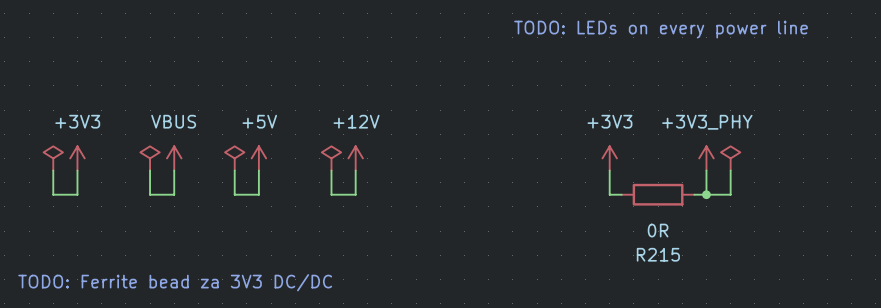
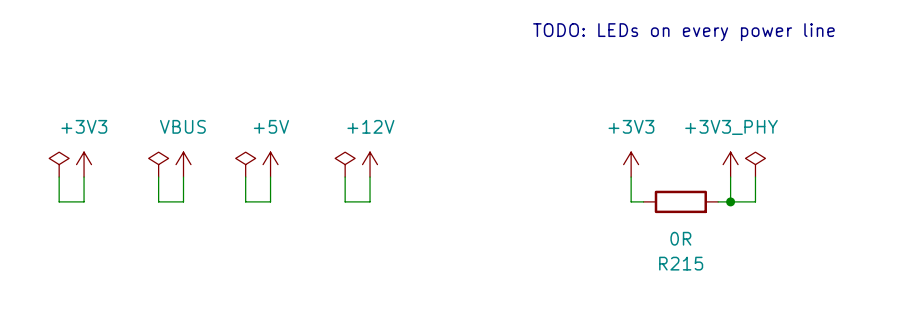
text: TODO: Ferrite bead za 3V3 DC/DC (175, 282) -> none

